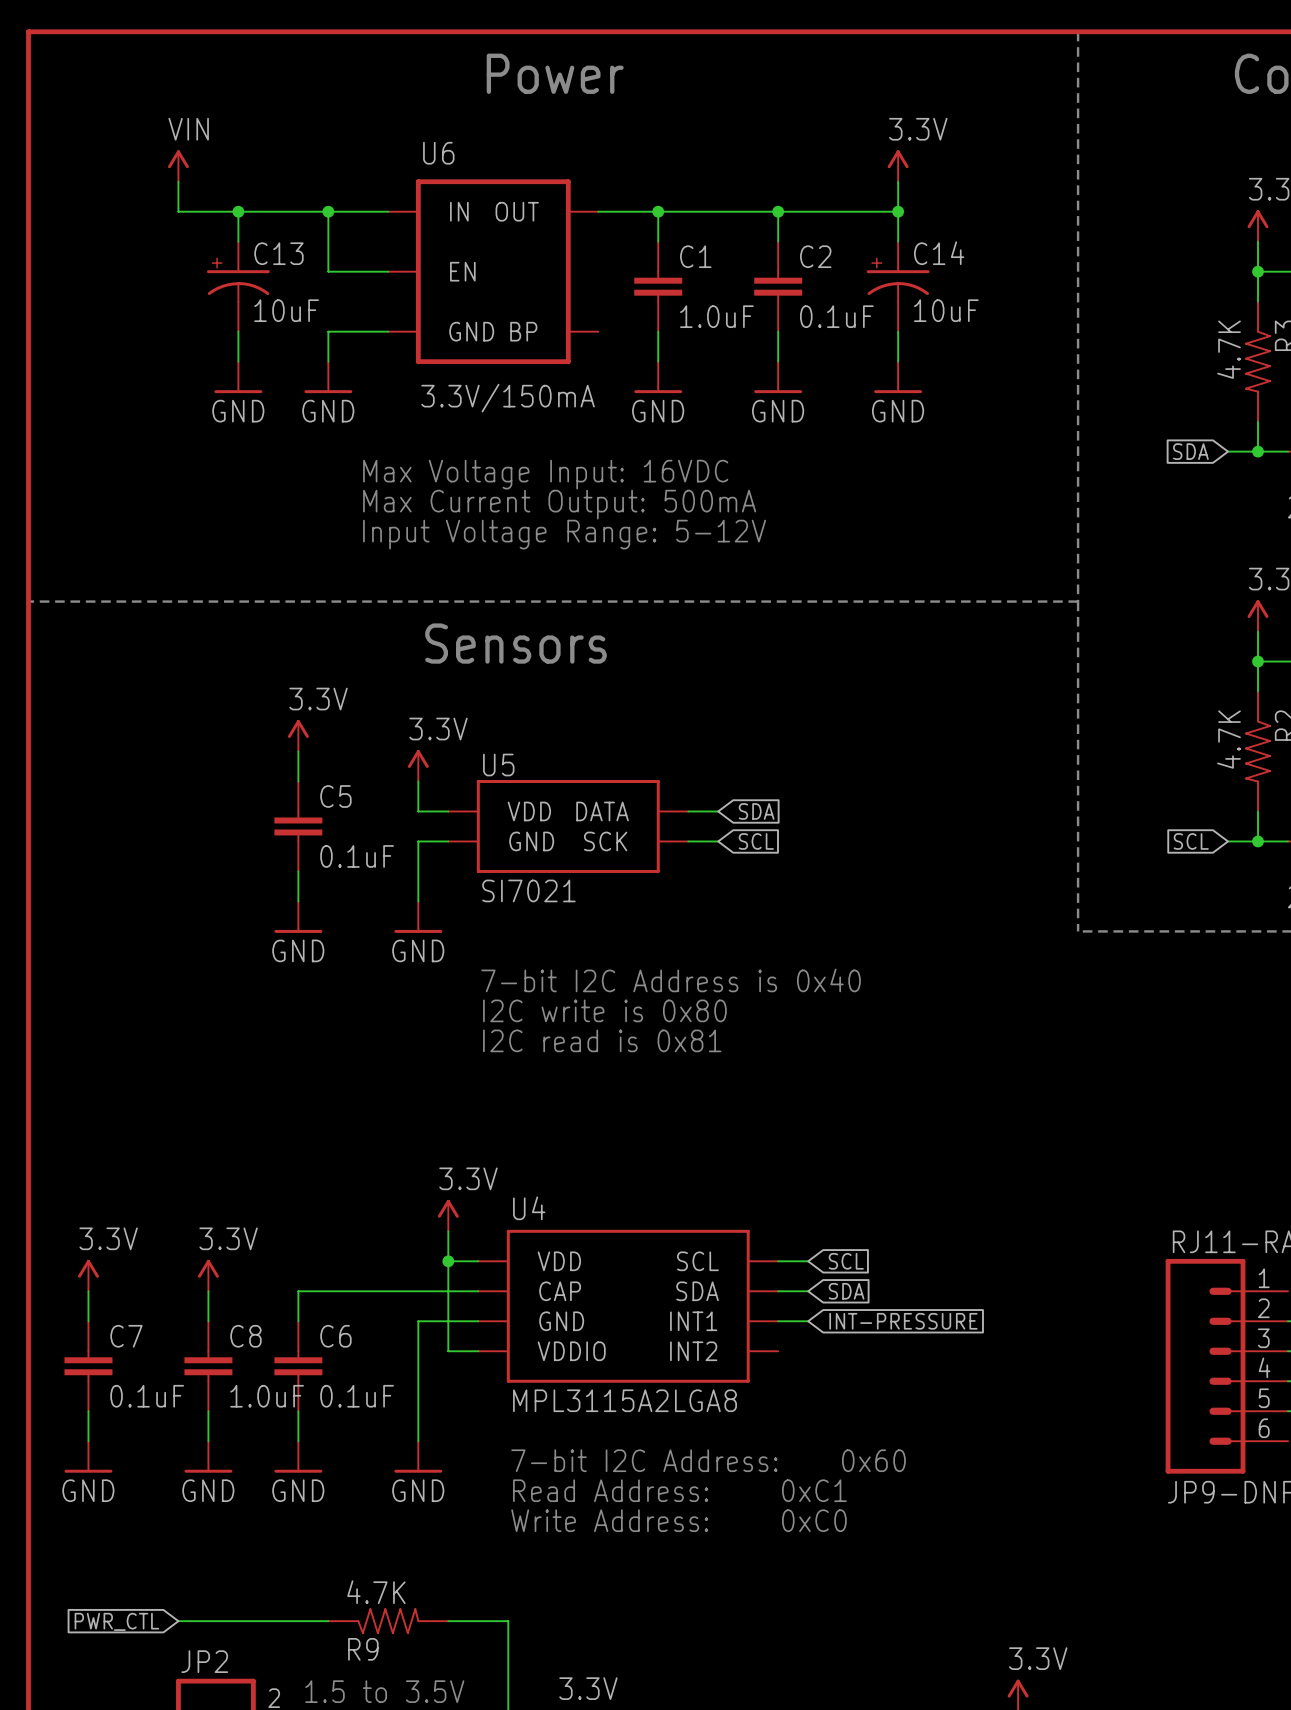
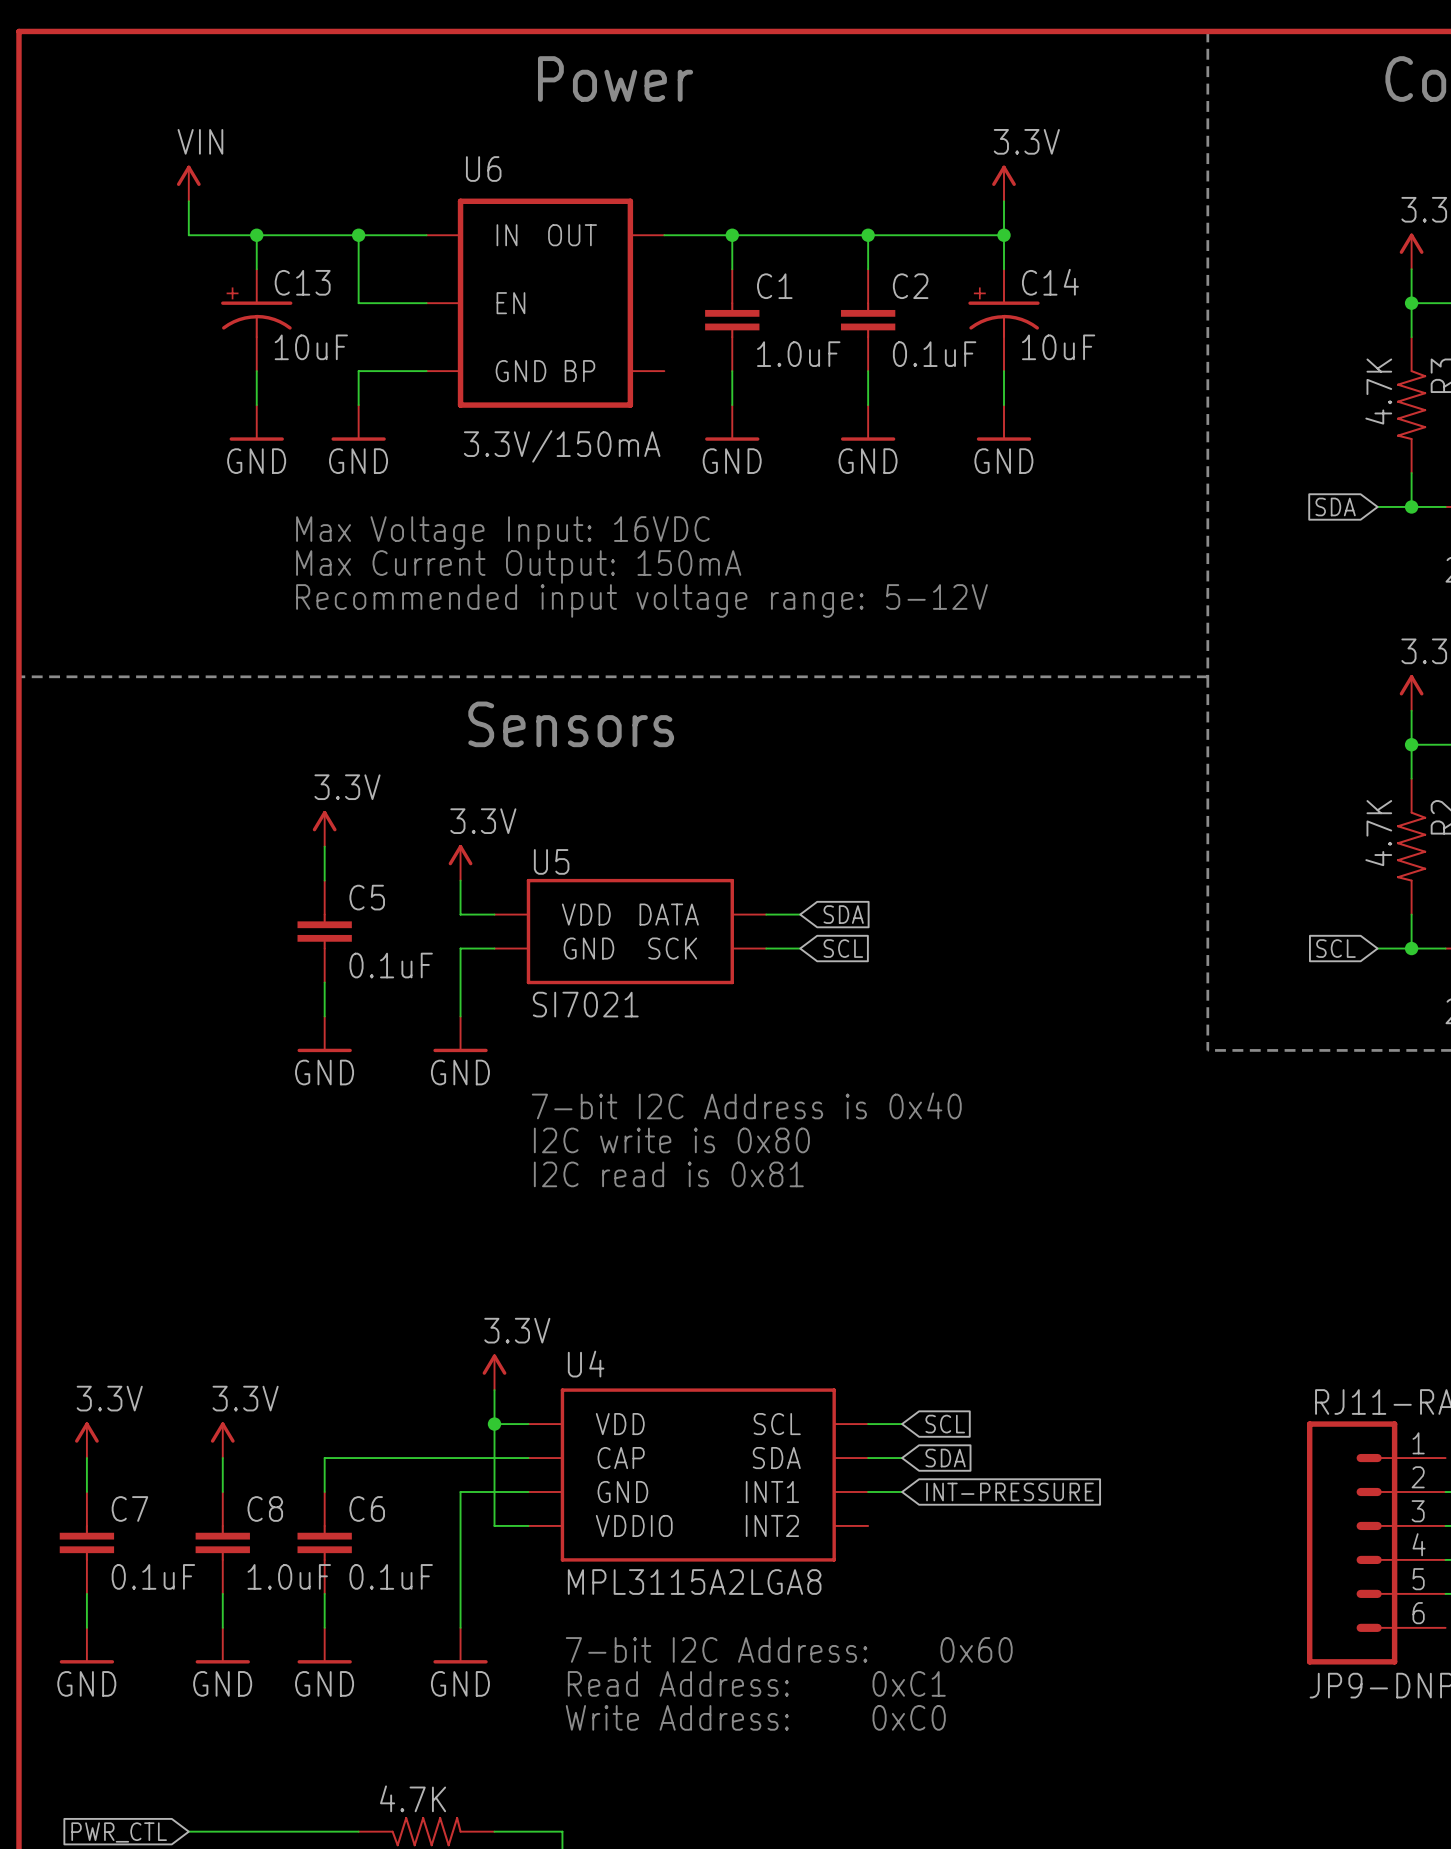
text position: Max Voltage Input: 16VDC (545, 474) -> Max Voltage Input: 16VDC (502, 533)
text: Max Current Output: 500mA (559, 504) -> Max Current Output: 150mA (518, 566)
text: Input Voltage Range: 5-12V (564, 534) -> Recommended input voltage range: 5-12V (641, 600)

